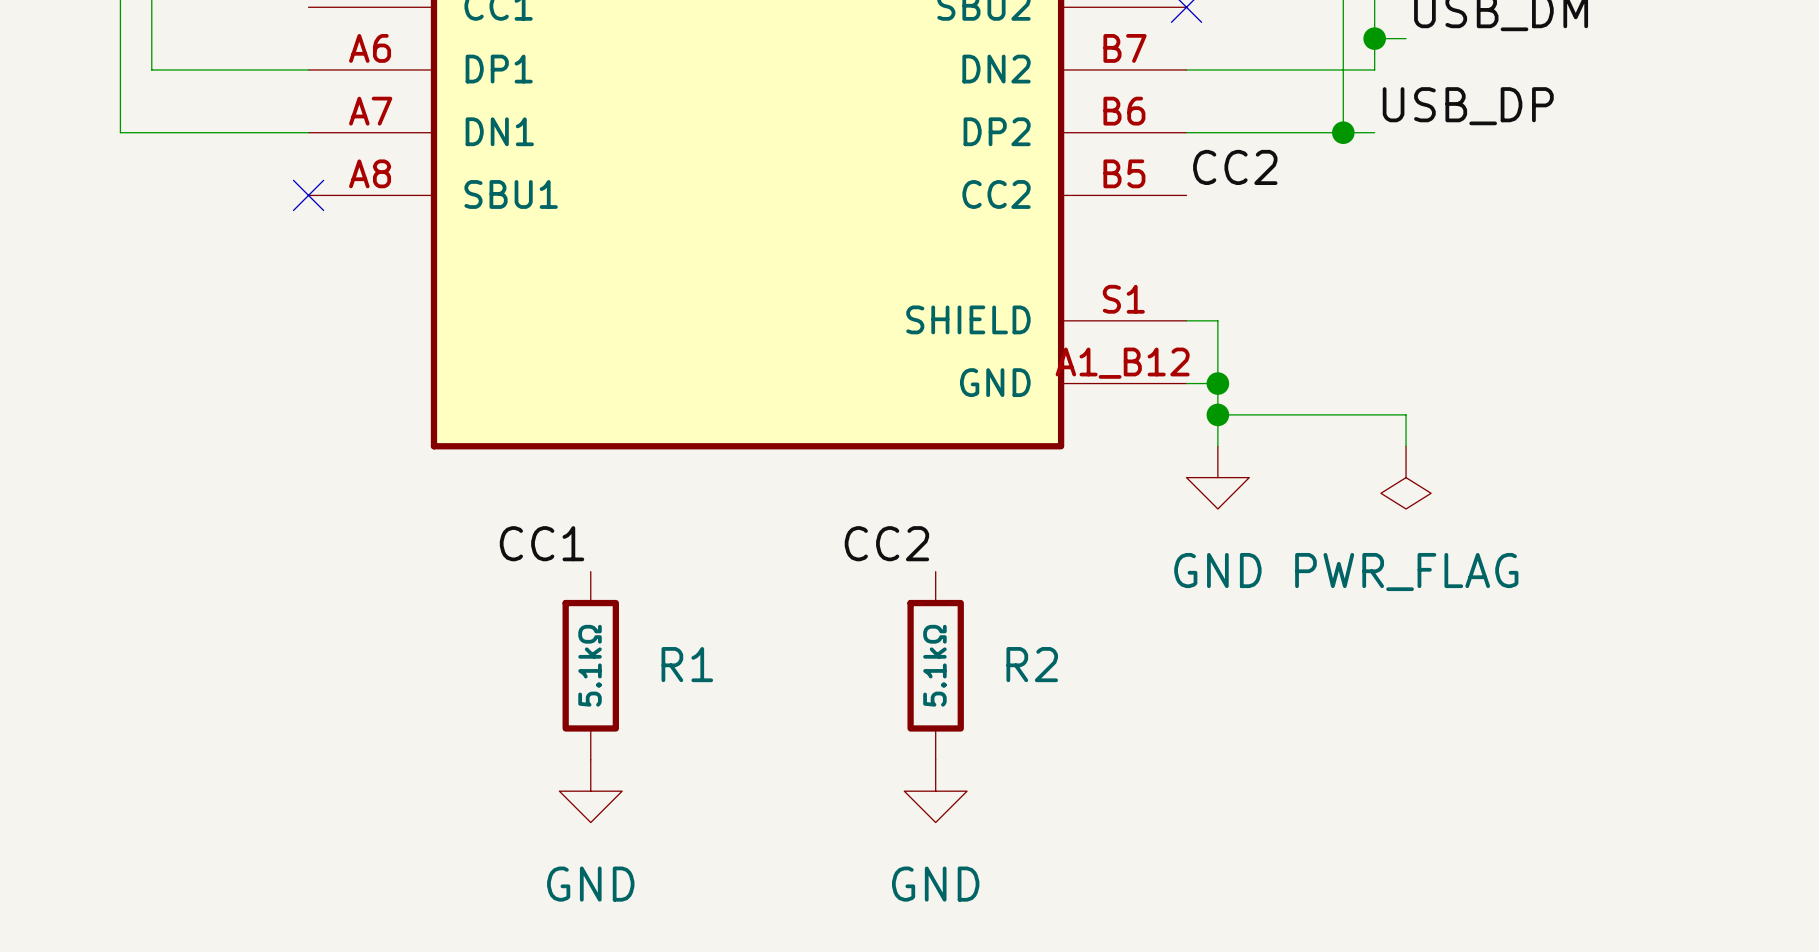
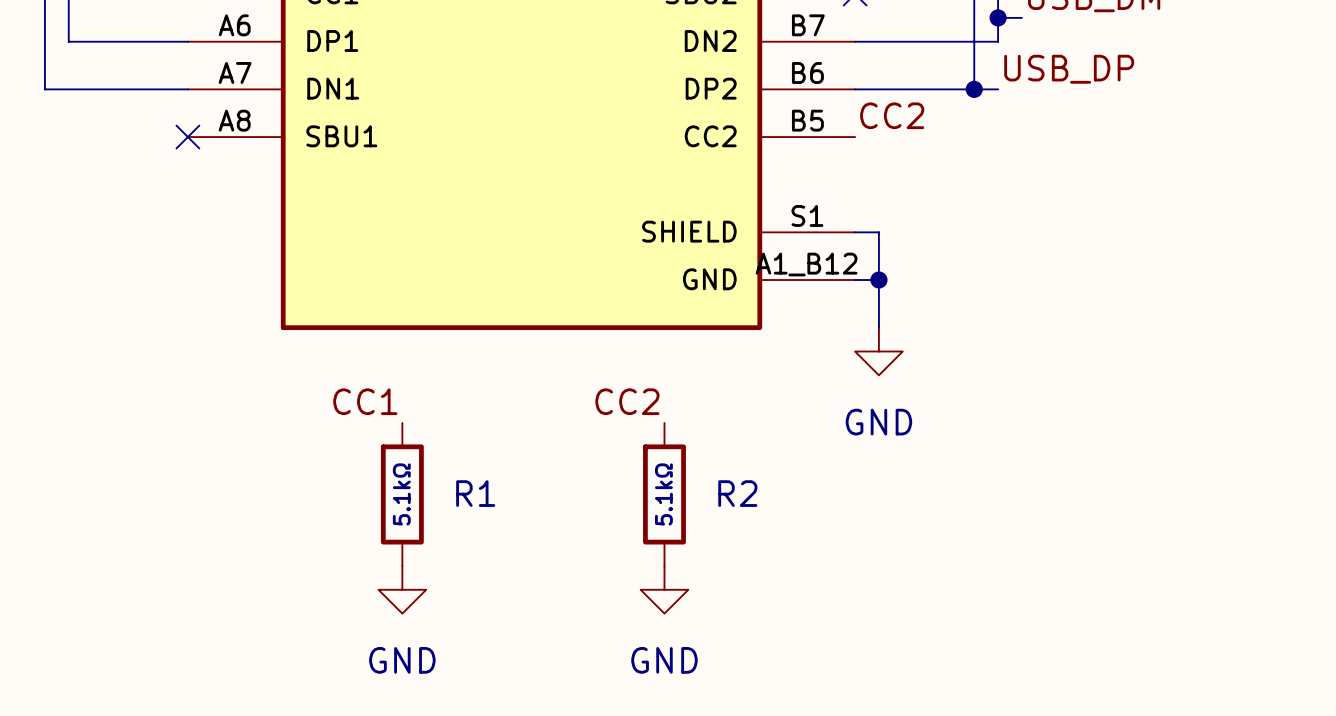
wire: (1217, 414) (1406, 414) (1406, 446) -> none
junction: (1217, 414) -> none
power symbol: PWR_FLAG (1406, 477) -> none

